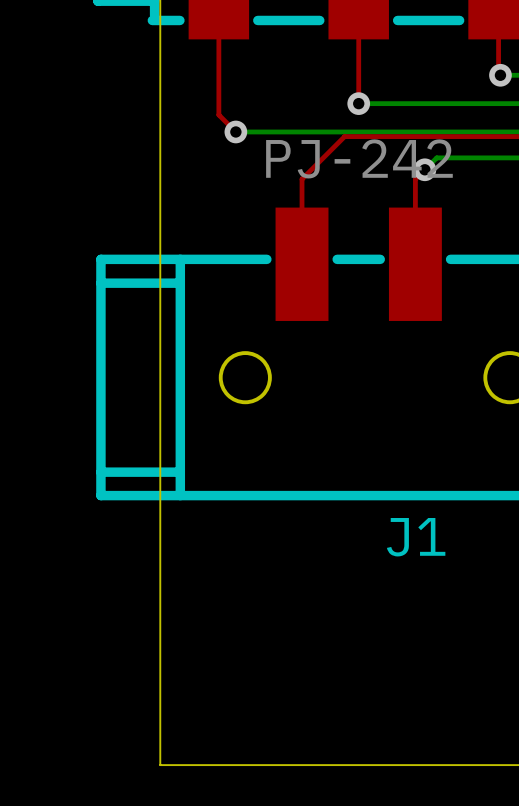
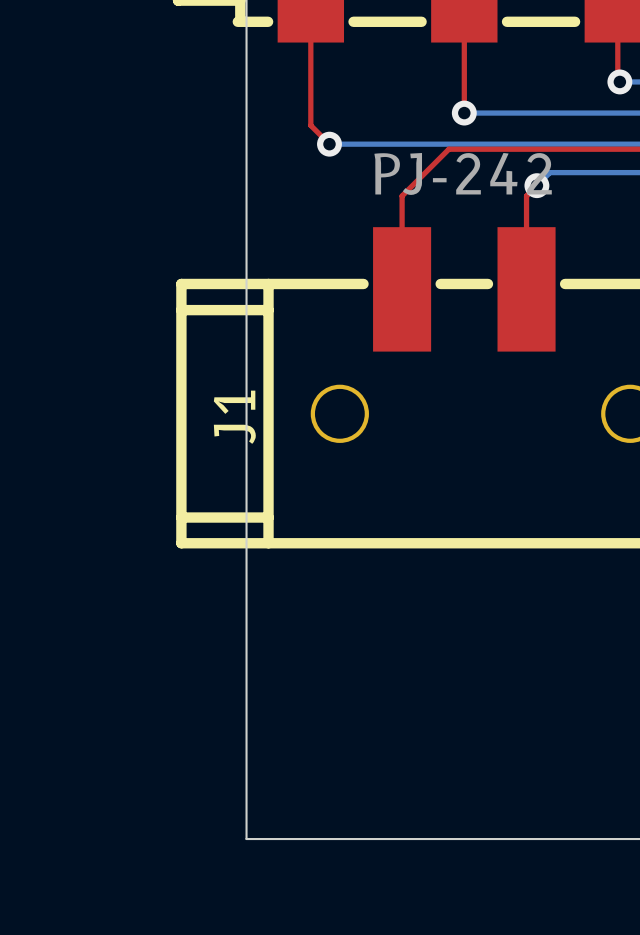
J1 name rotation: 0° (416, 537) -> 90° counterclockwise (234, 417)
J1 name position: J1 (416, 537) -> J1 (234, 417)

